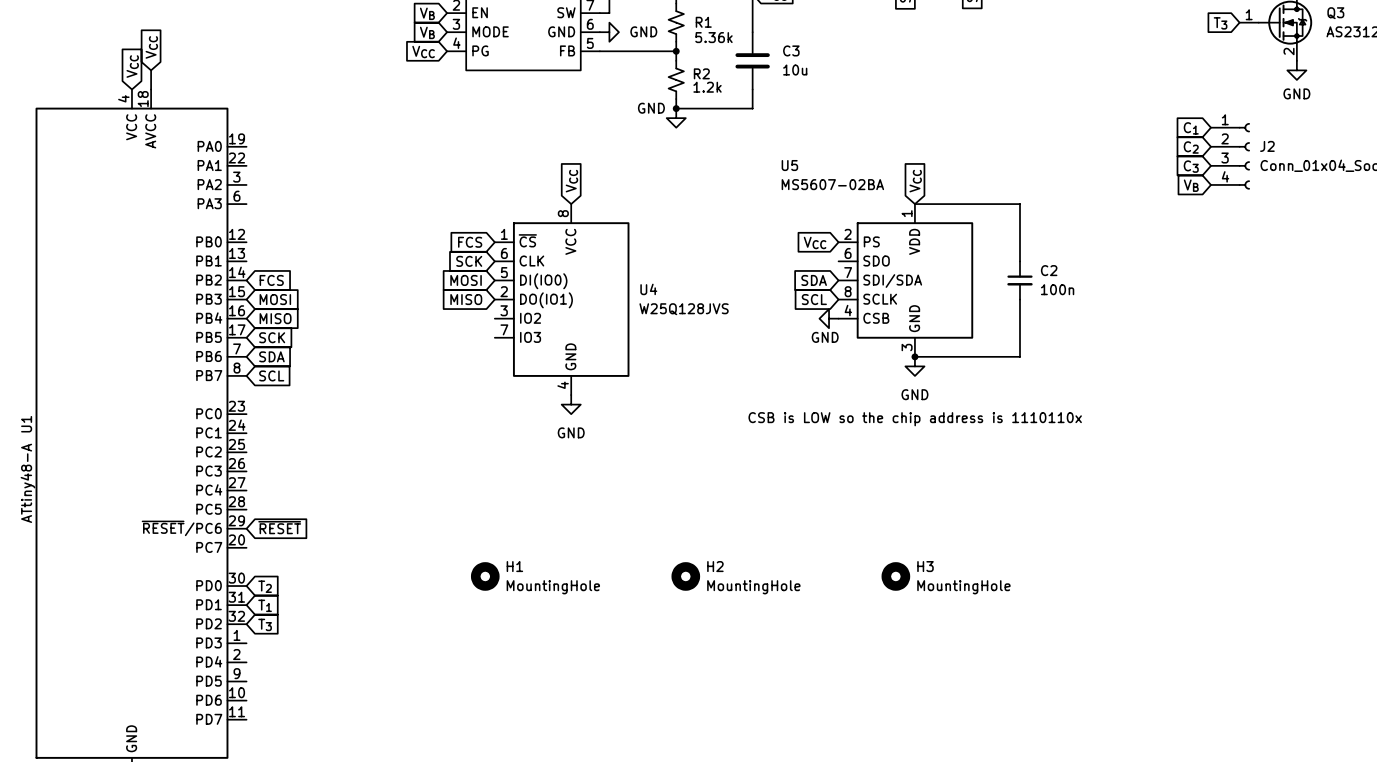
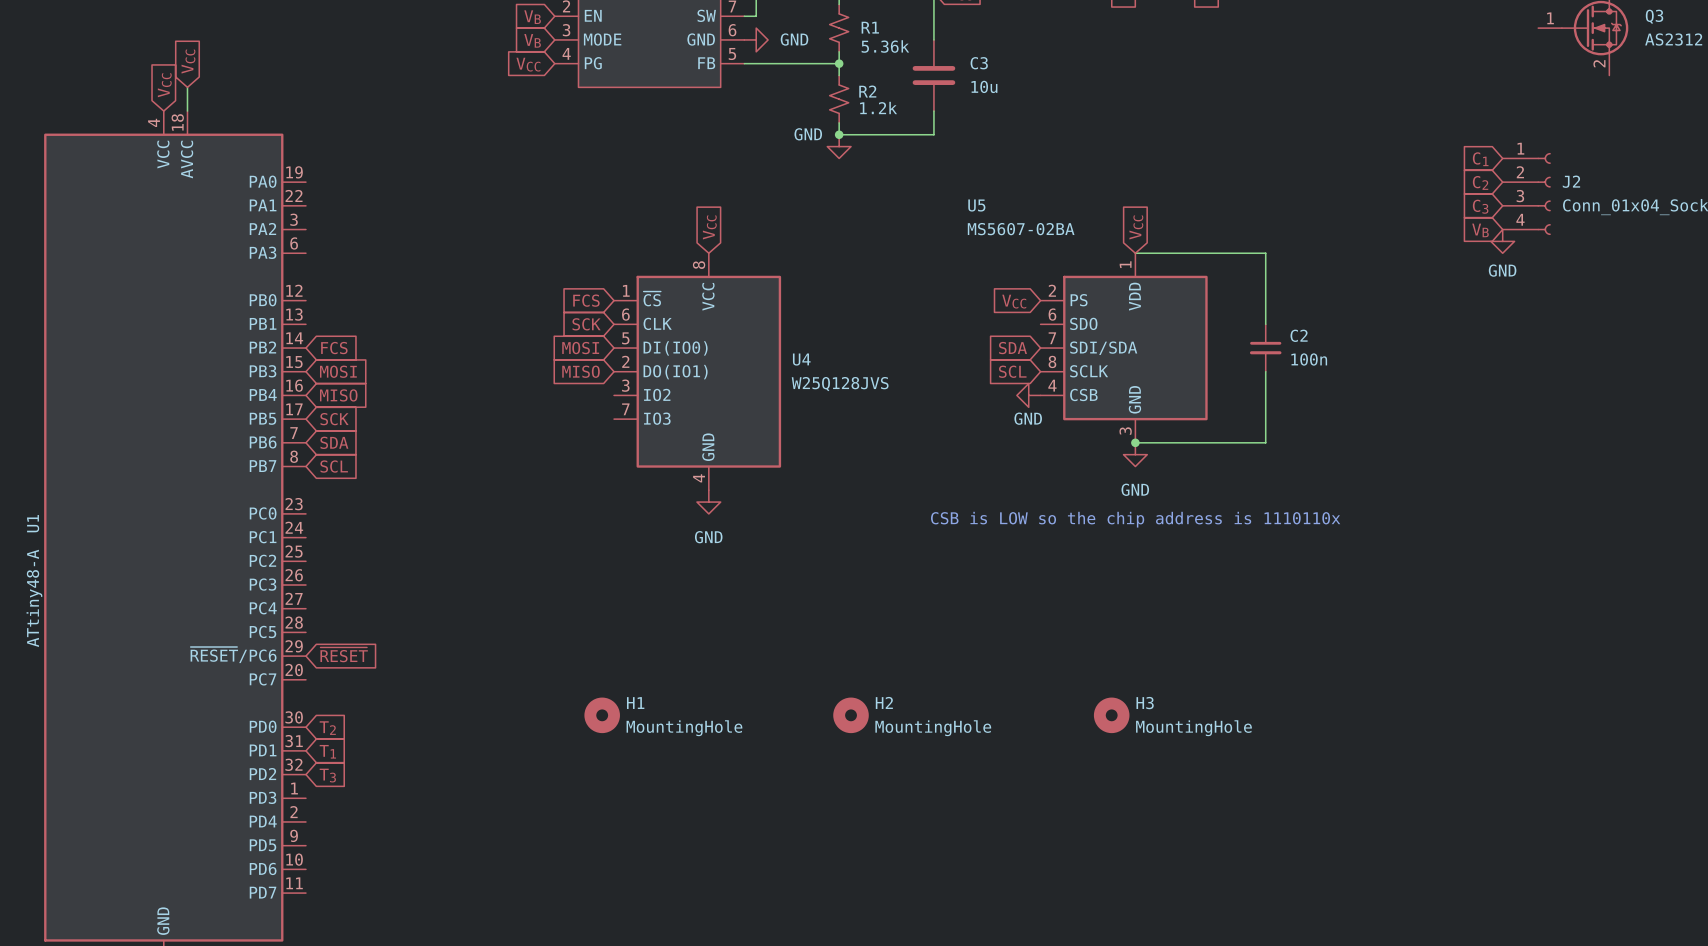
global label: T3 (1220, 23) -> none
power symbol position: GND (1296, 70) -> GND (1502, 241)

